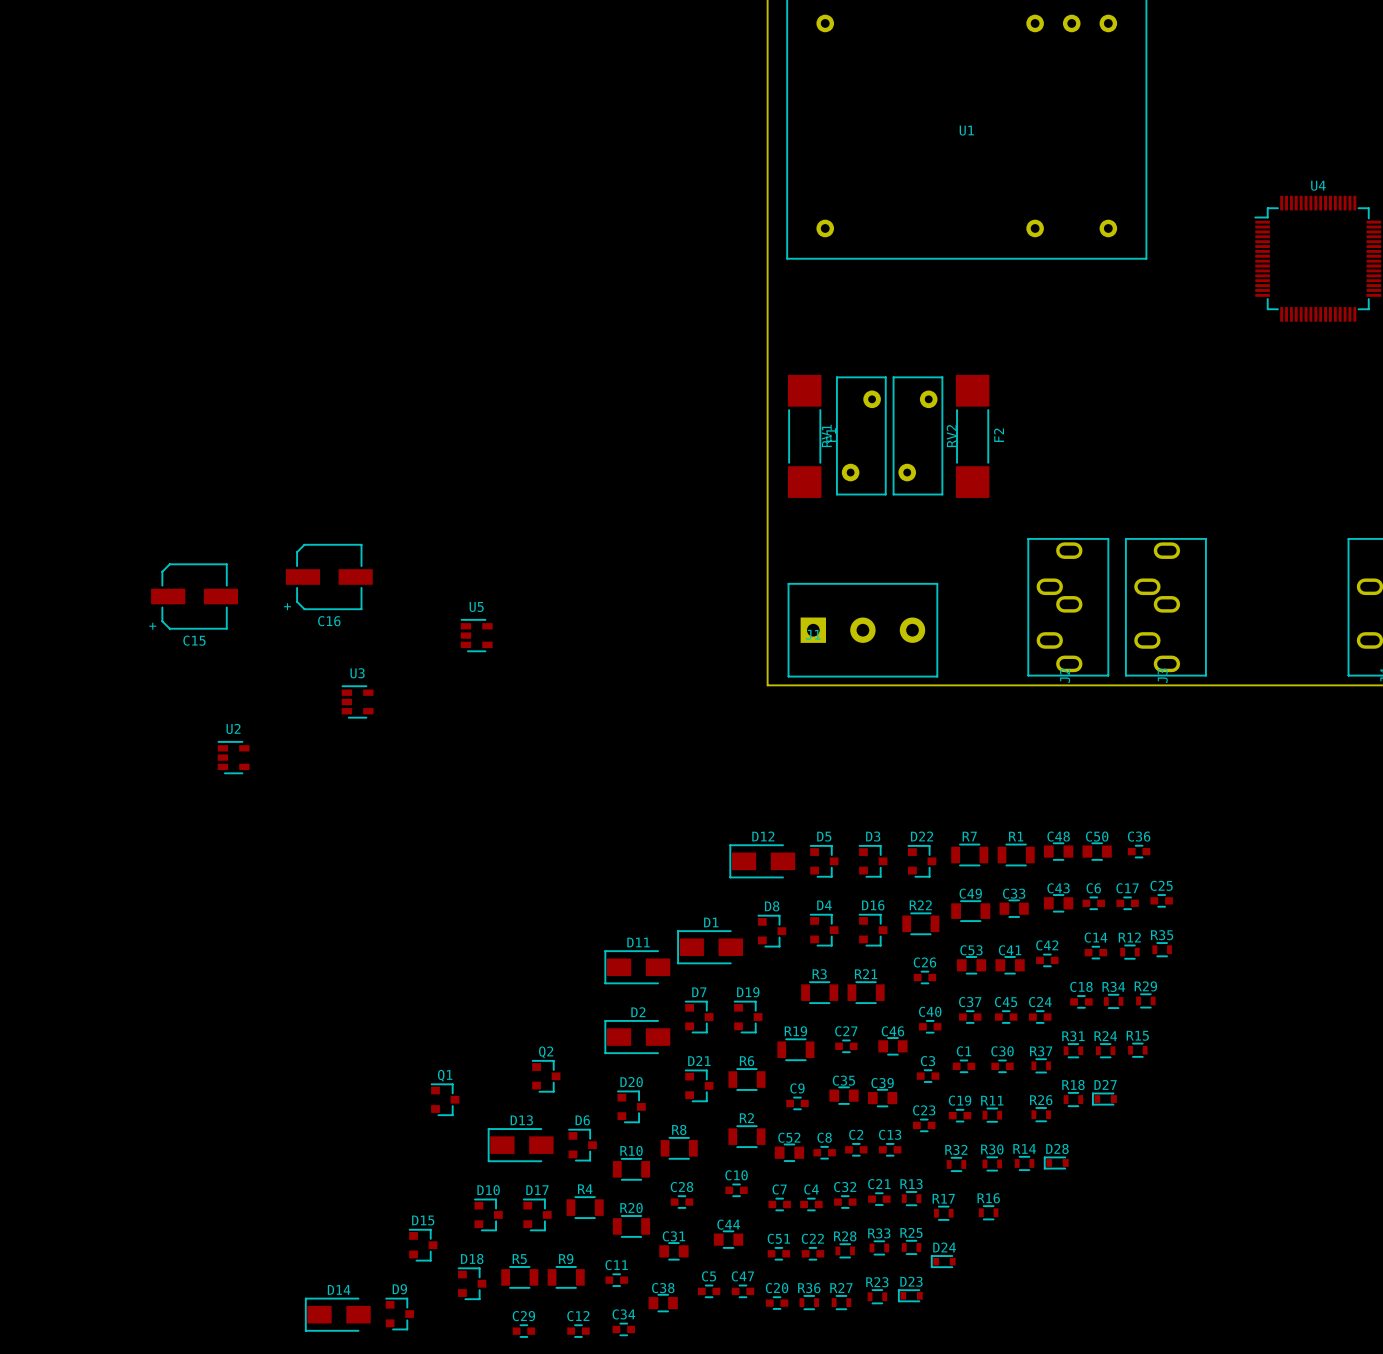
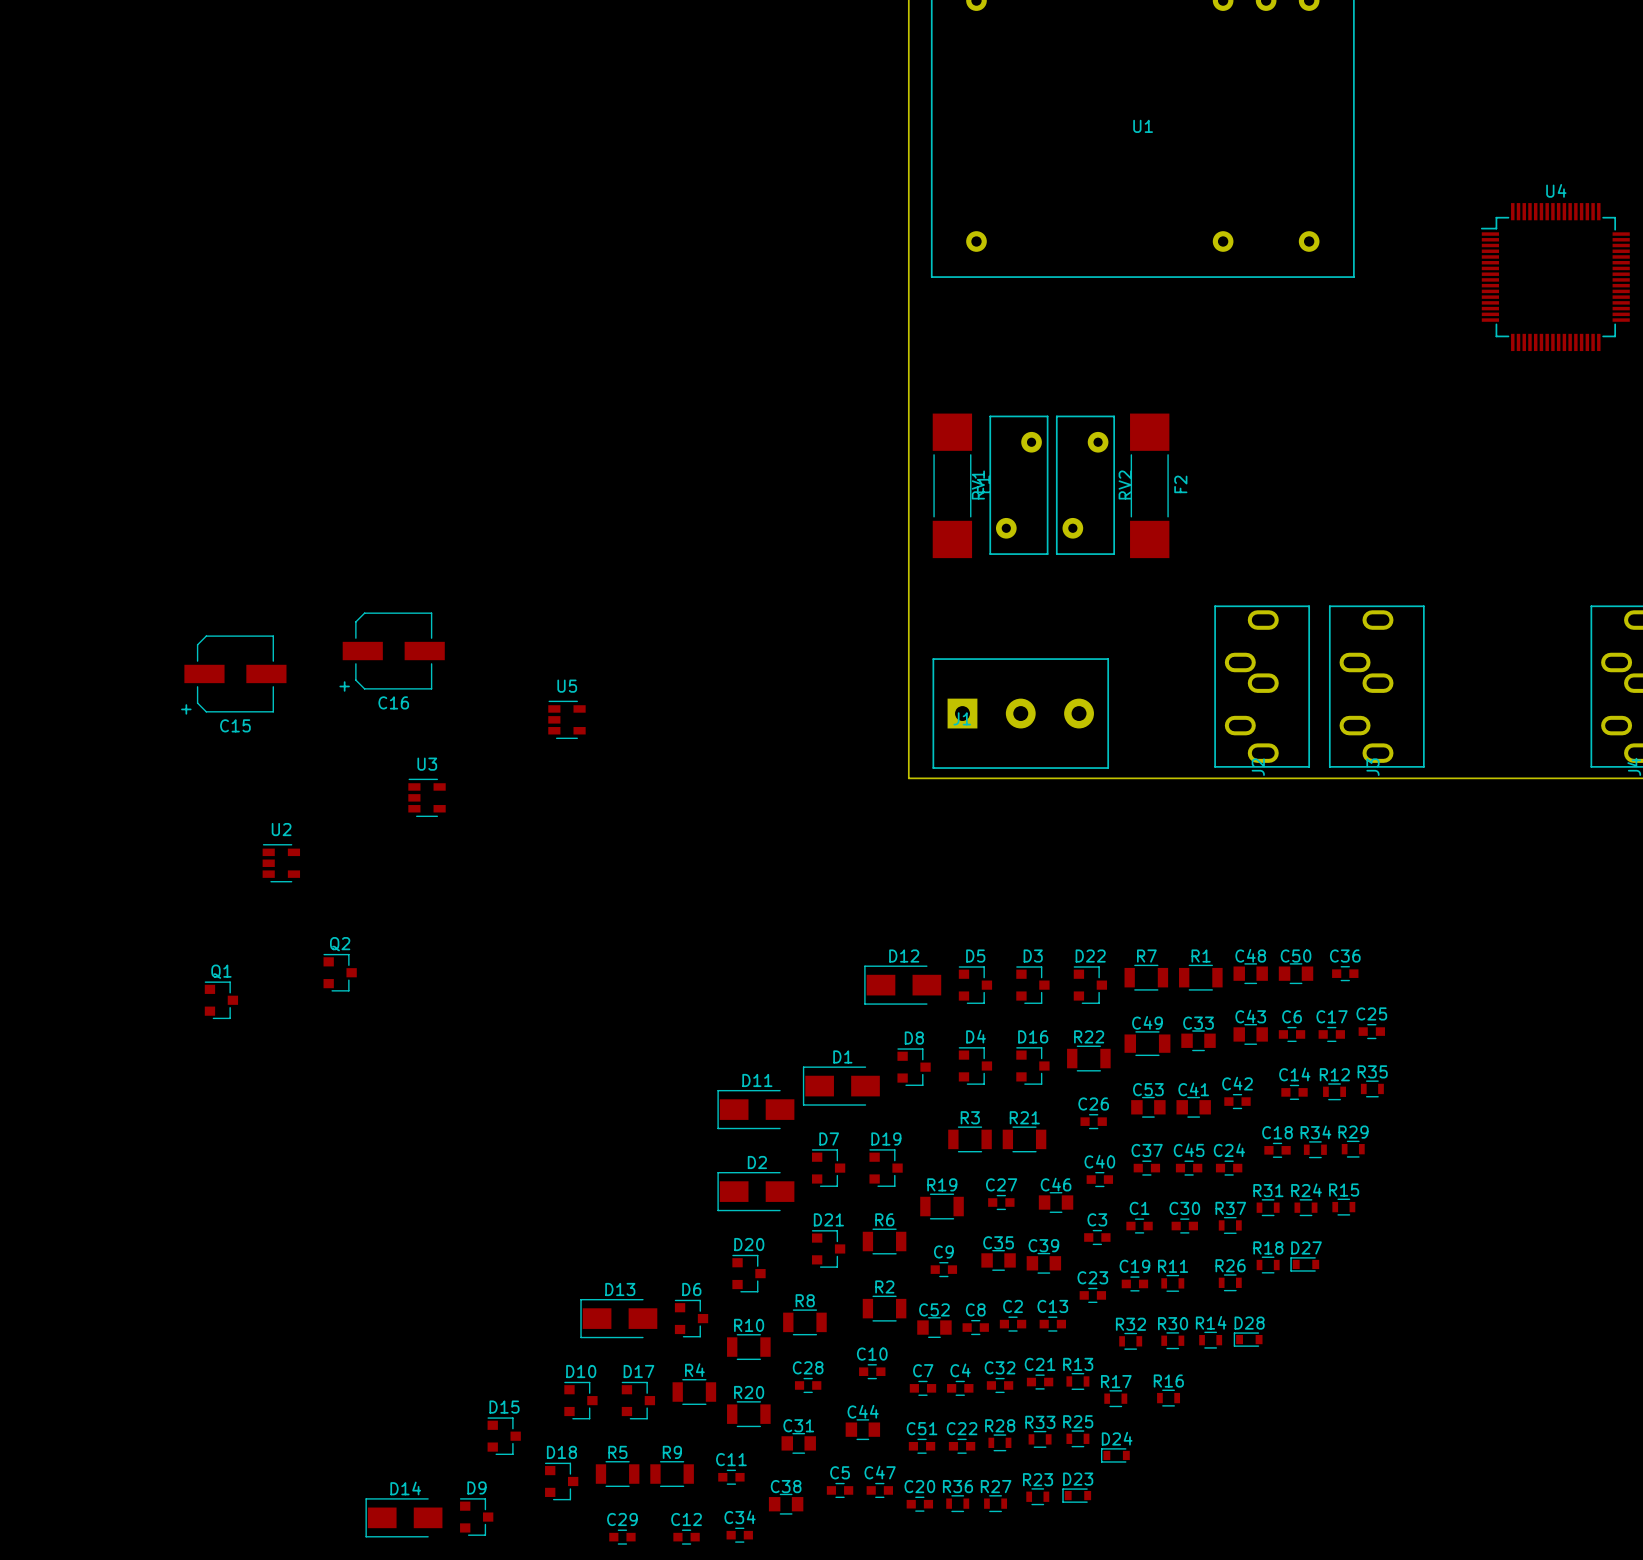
Q2 position: (546, 1076) -> (340, 972)
Q1 position: (445, 1099) -> (221, 1000)

